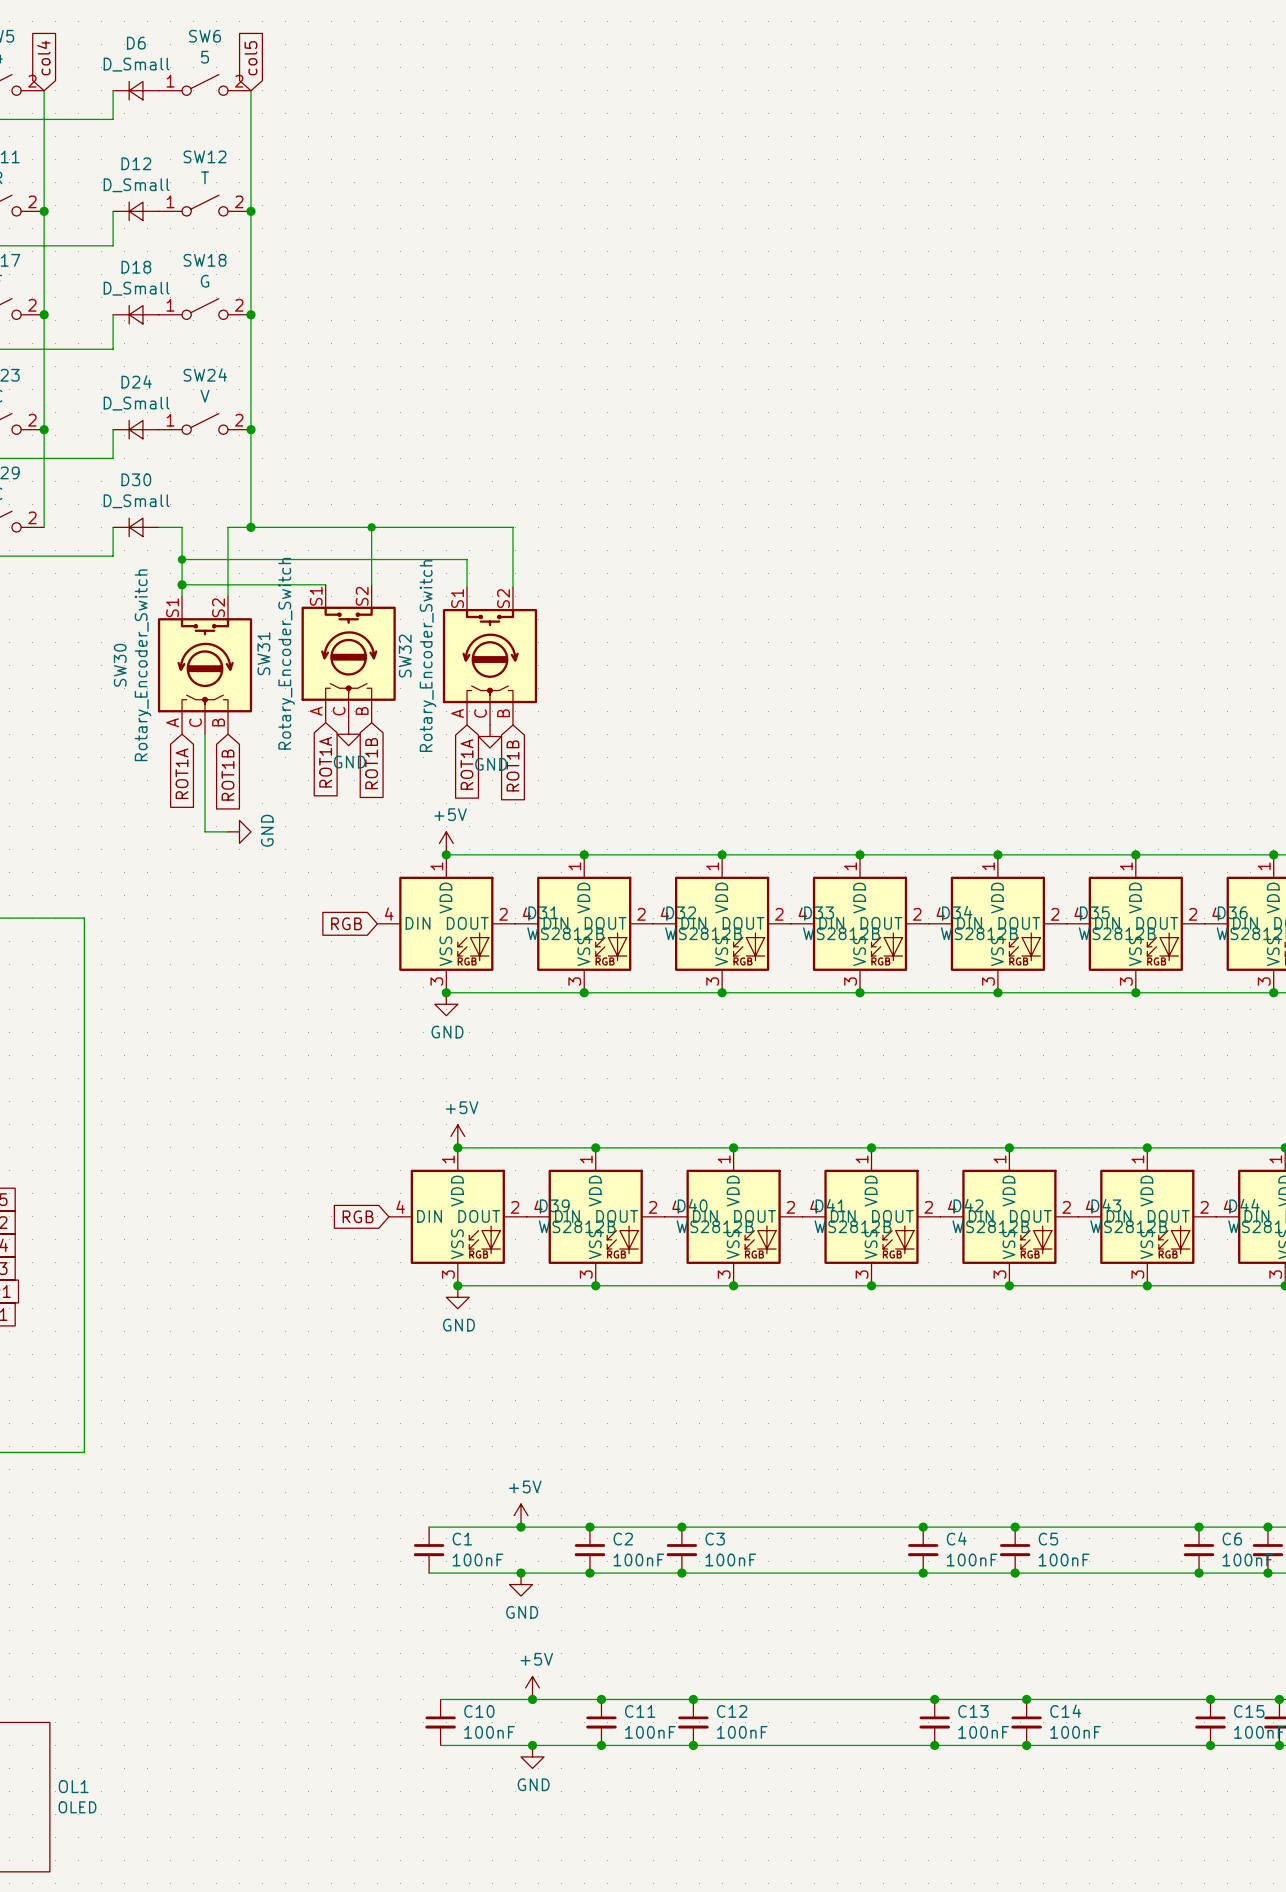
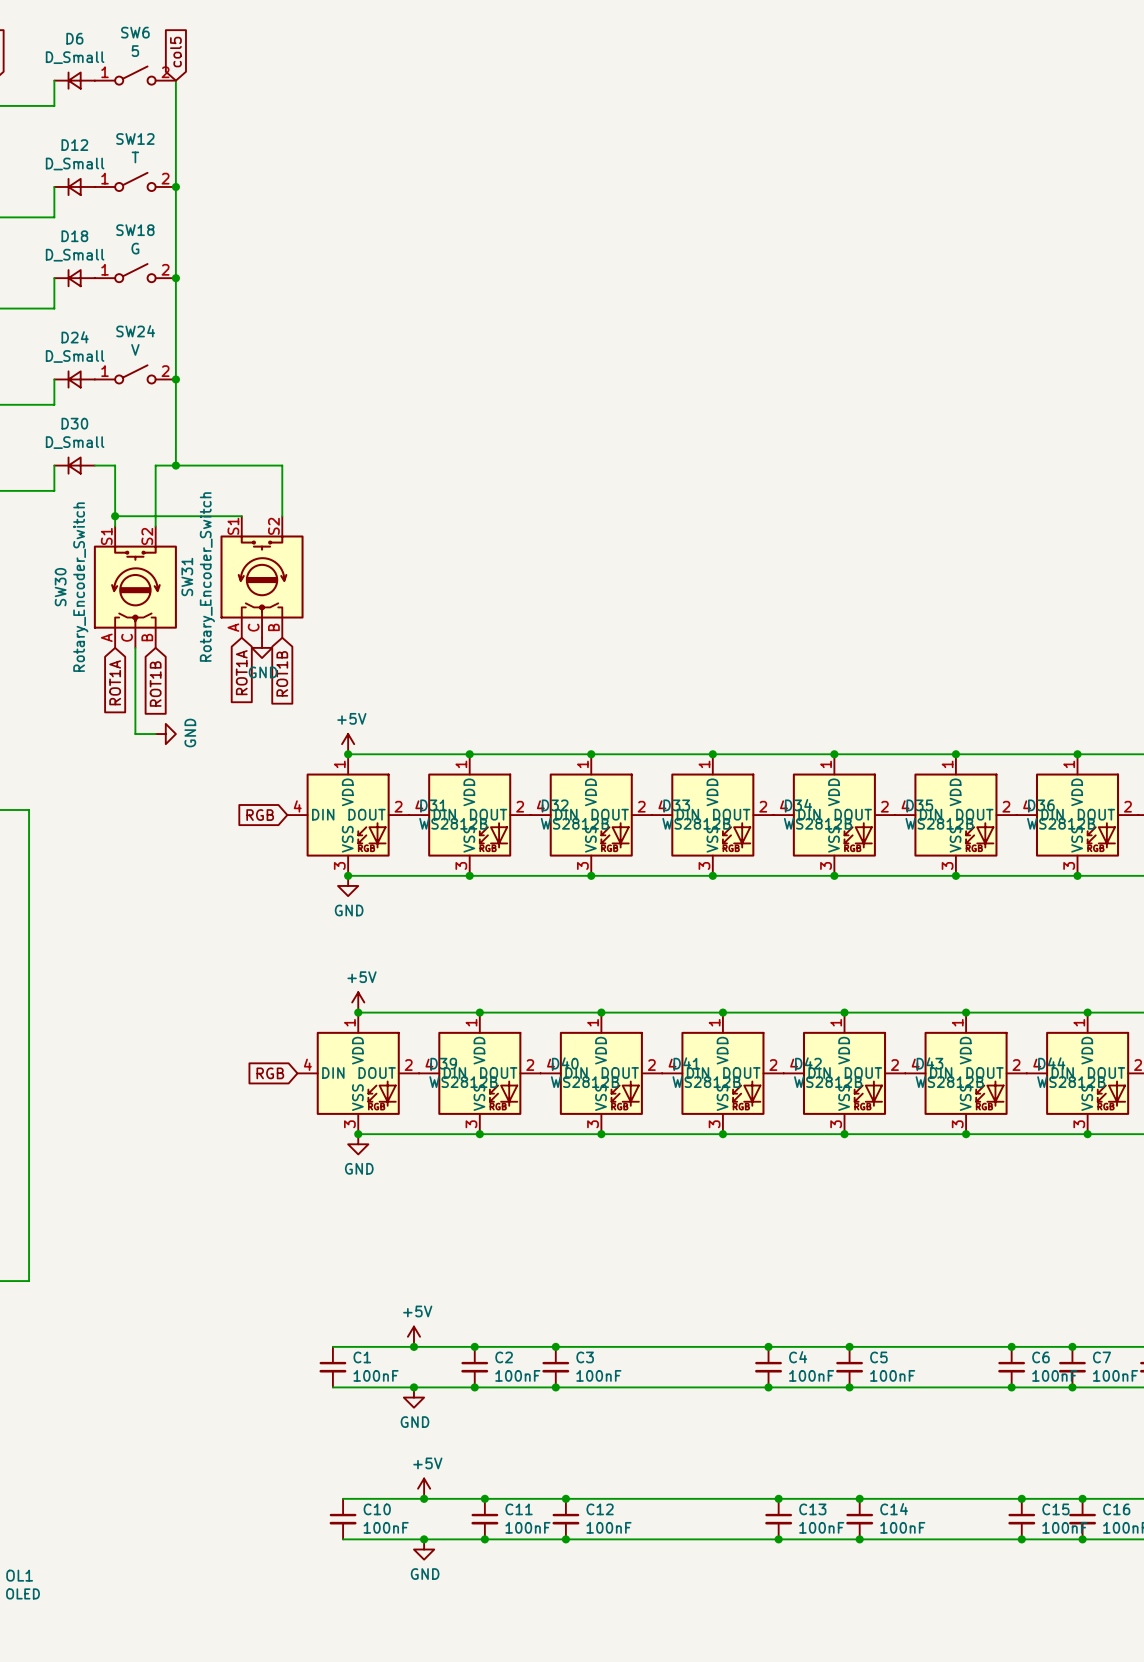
wire: (371, 527) (512, 527) (512, 587) -> none
junction: (371, 527) -> none
wire: (182, 559) (467, 559) (467, 587) -> none
junction: (182, 559) -> none
SW32: Rotary_Encoder_Switch (490, 656) -> none
power symbol: GND (490, 736) -> none
global label: ROT1A (467, 764) -> none
global label: ROT1B (512, 765) -> none

